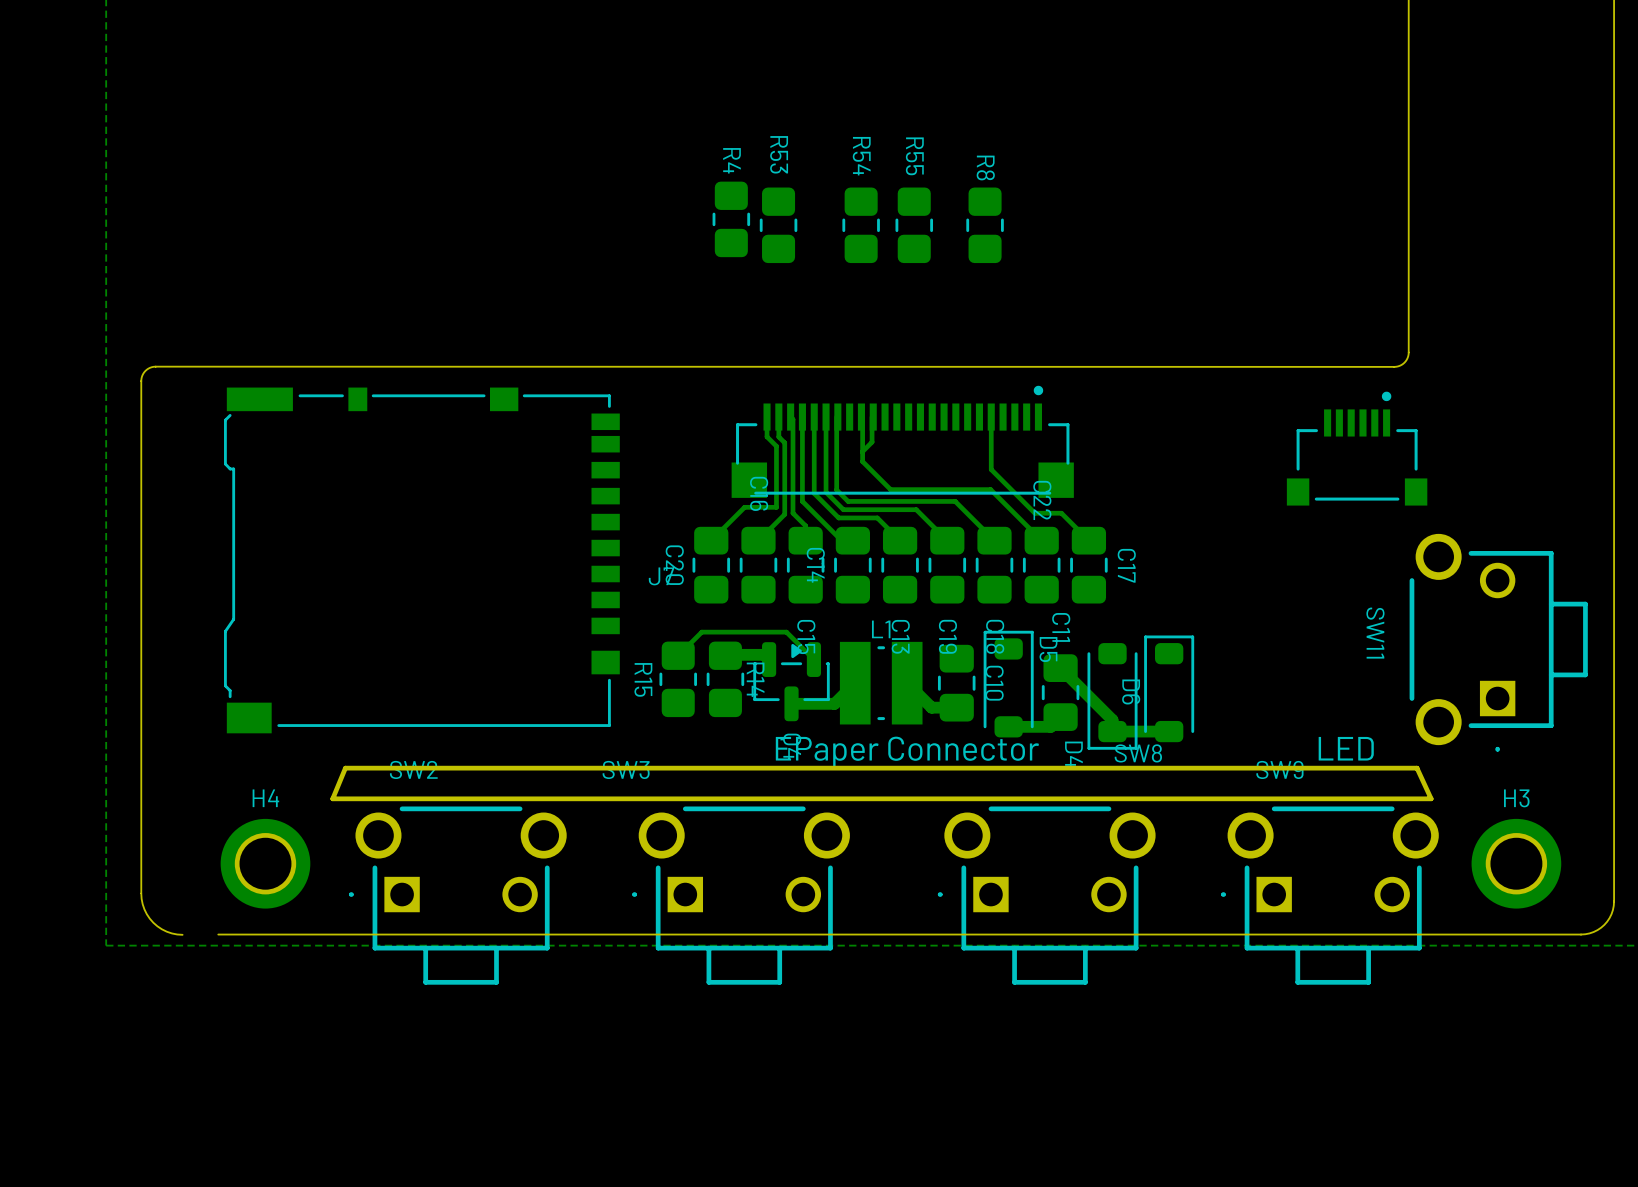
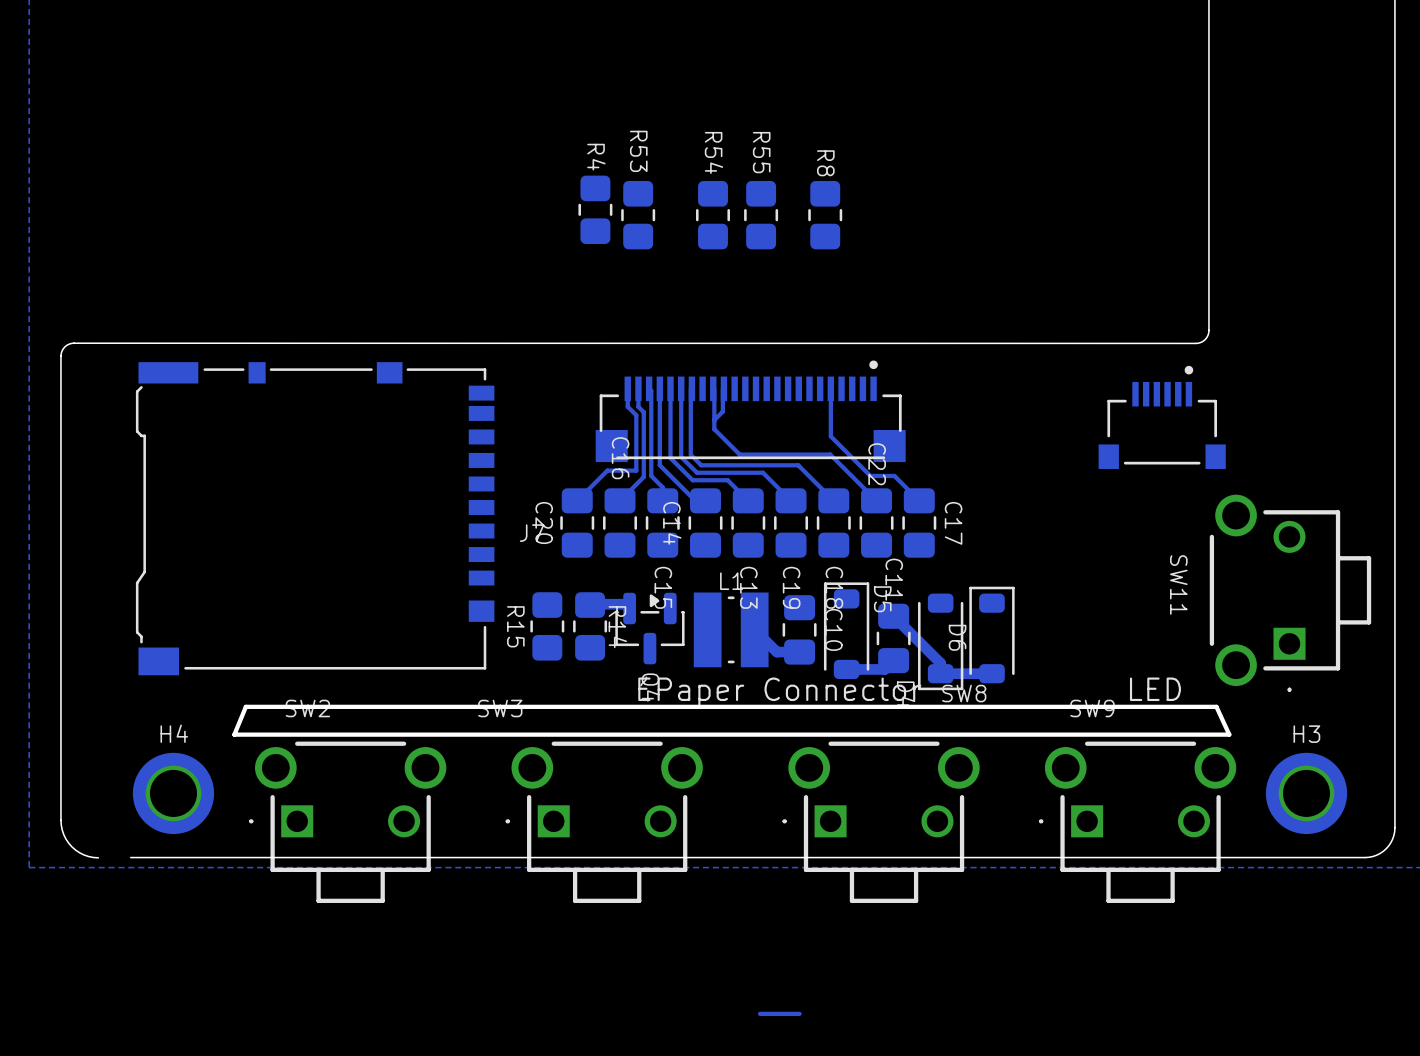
track: (678, 655) (701, 632) (786, 632) (813, 659) -> none
track: (855, 683) (834, 703) (791, 703) -> none
track: none -> (799, 1013) (760, 1013)

